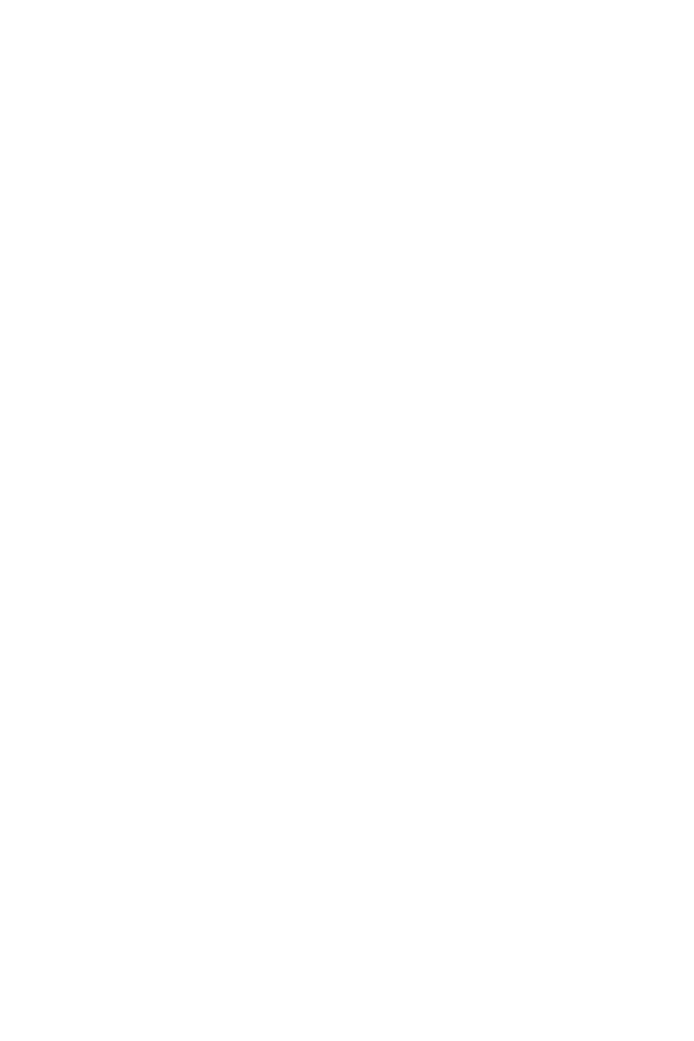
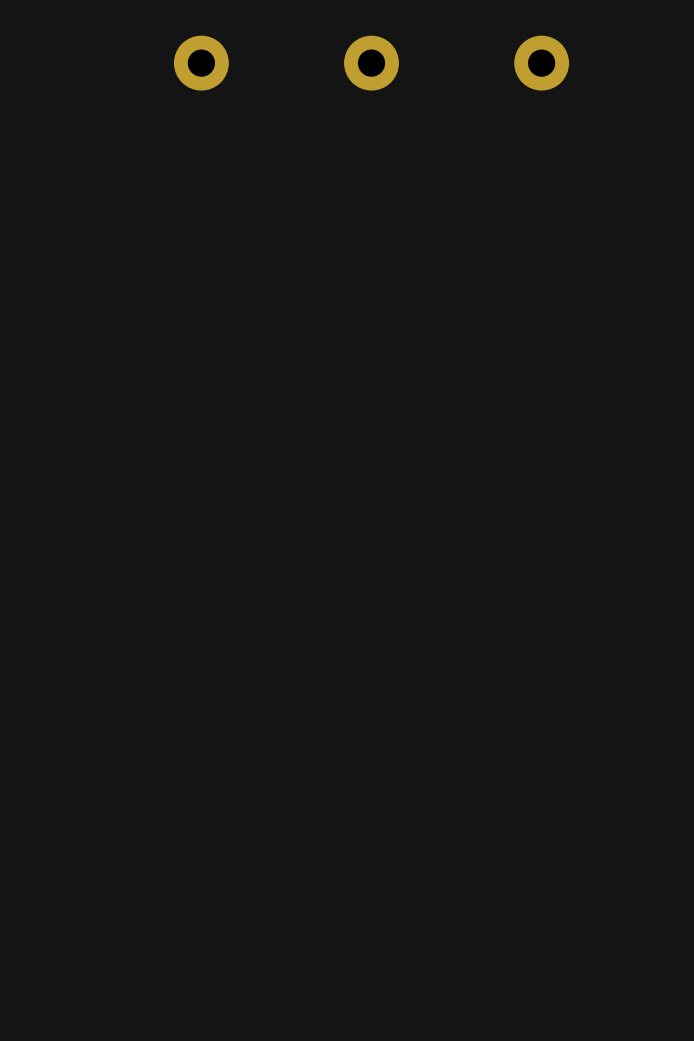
via: none -> (201, 63)
via: none -> (371, 63)
via: none -> (541, 63)

